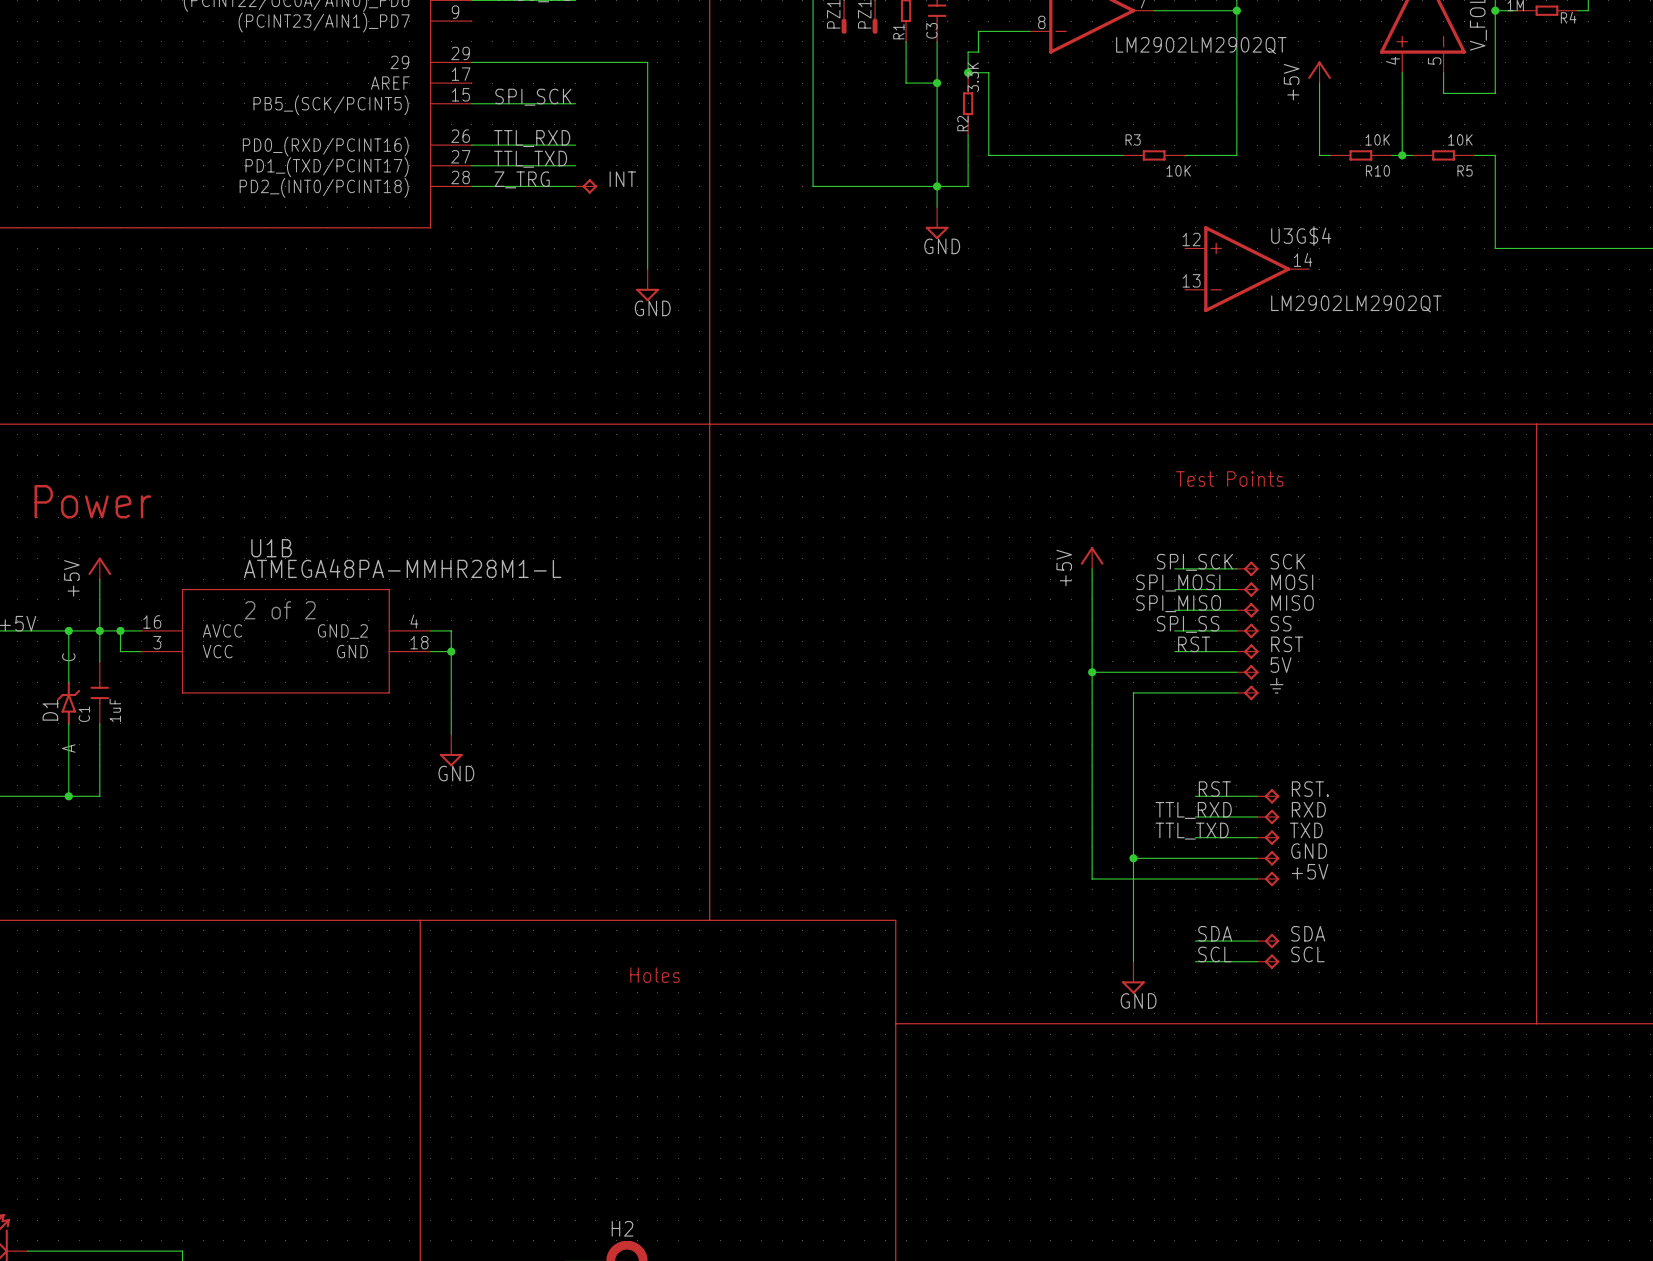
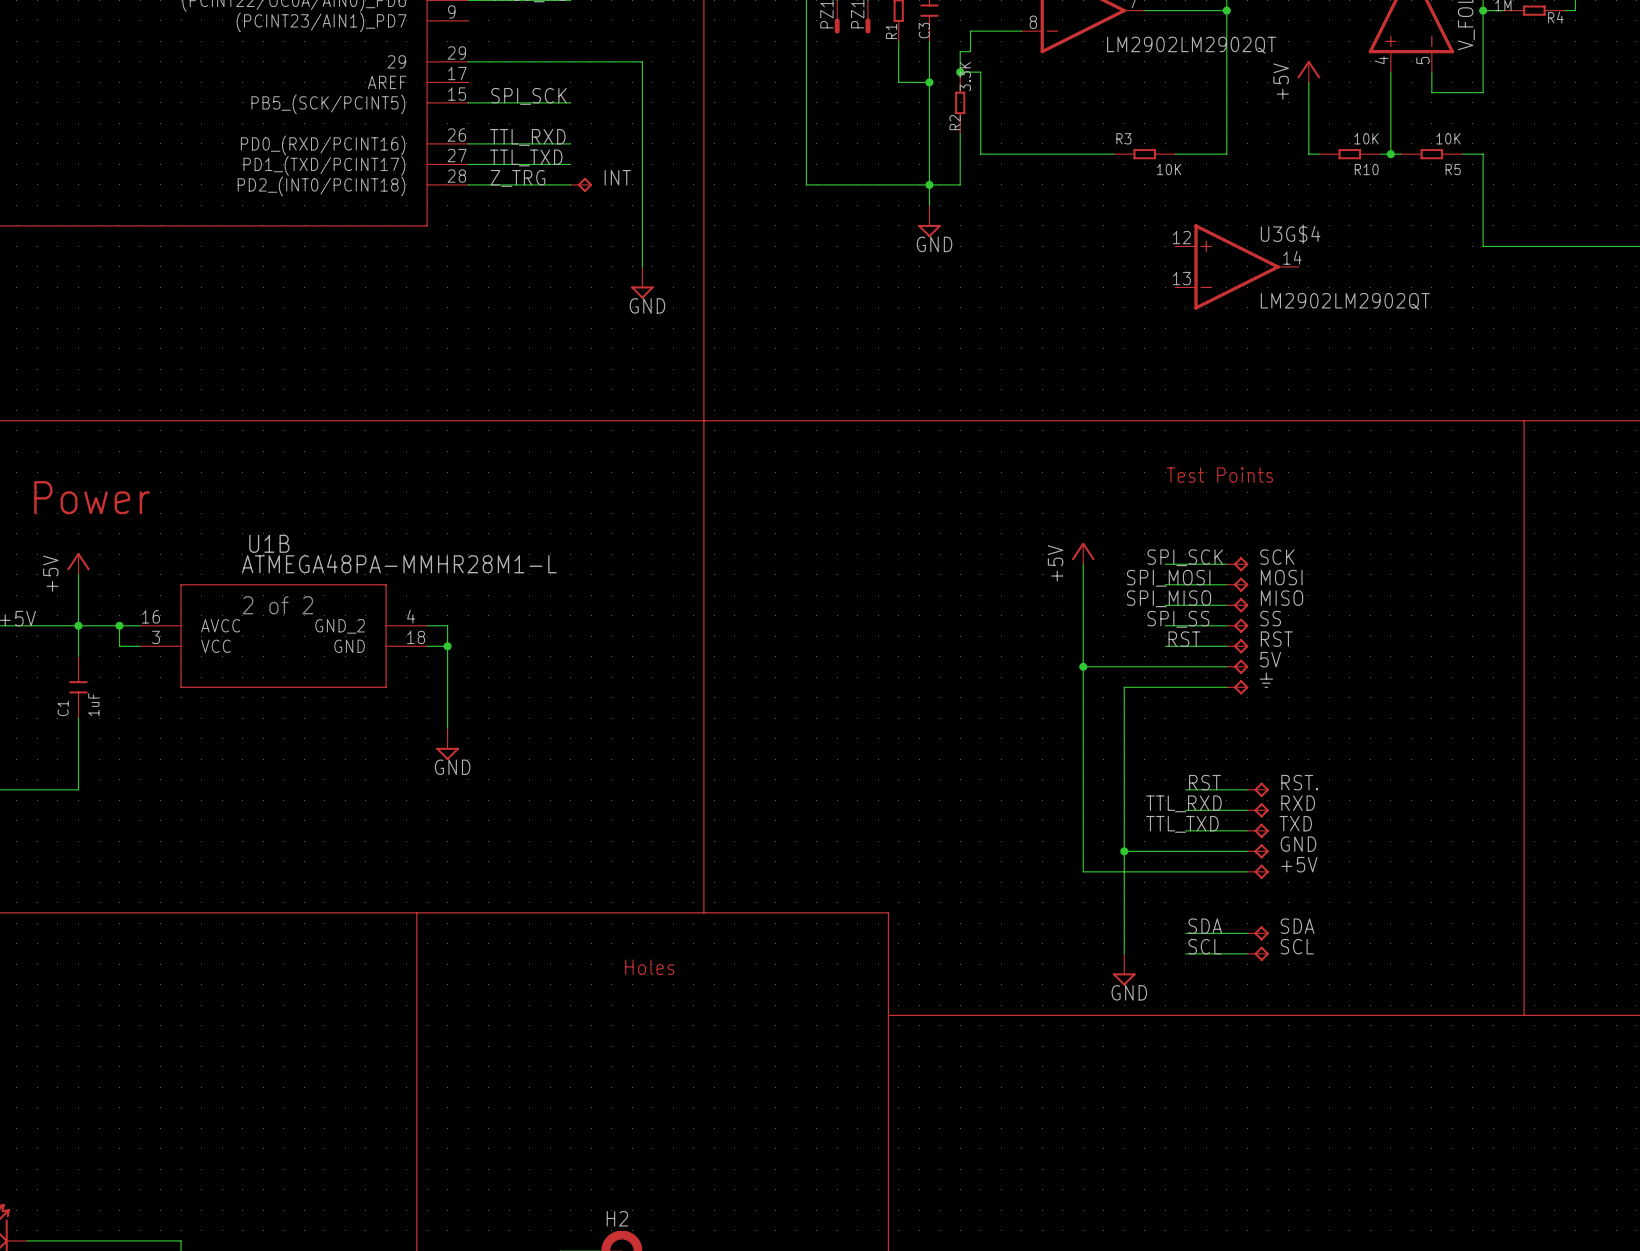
power symbol position: +5V (99, 568) -> +5V (78, 563)
wire: (99, 579) (99, 661) -> (78, 574) (78, 656)
wire: (68, 630) (68, 682) -> none
junction: (68, 630) -> none
junction: none -> (78, 625)
junction: (99, 630) -> none
C1 position: (99, 692) -> (78, 687)
D1: (68, 703) -> none
wire: (68, 723) (68, 796) -> none
wire: (99, 723) (99, 796) (79, 796) -> (78, 718) (78, 789)
junction: (68, 796) -> none

